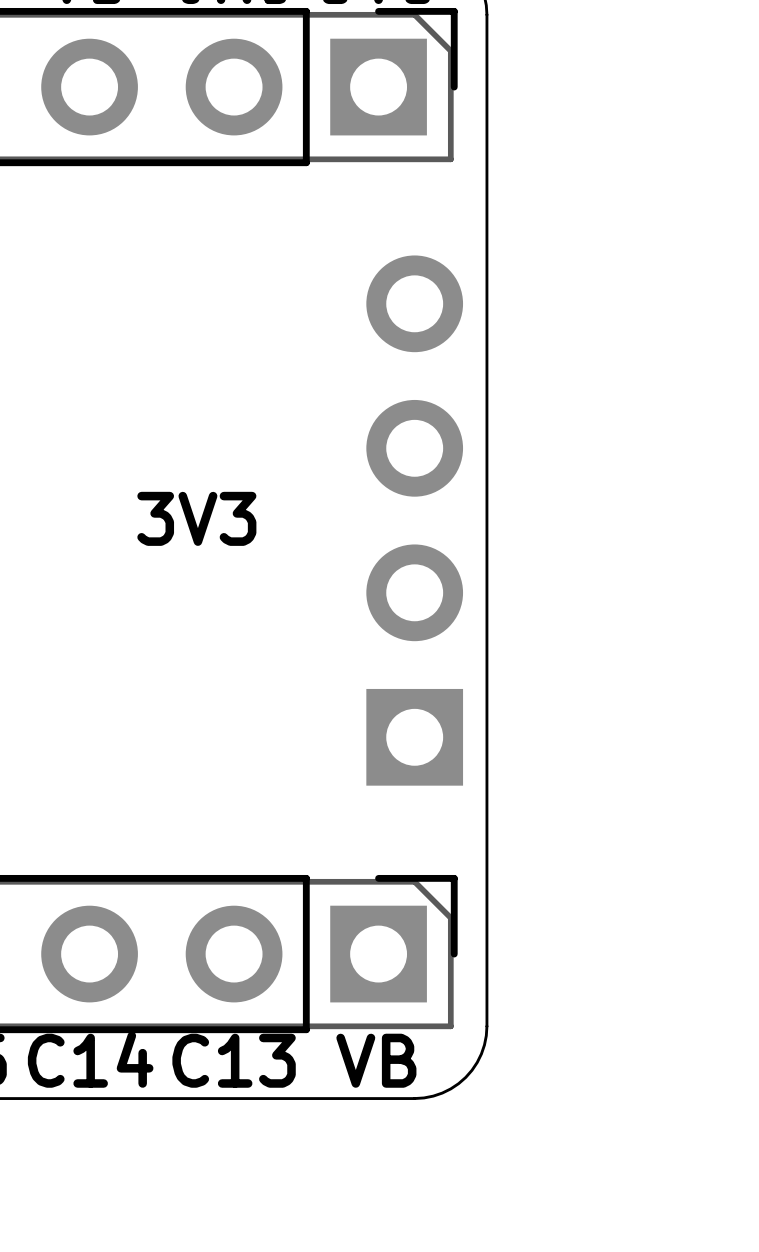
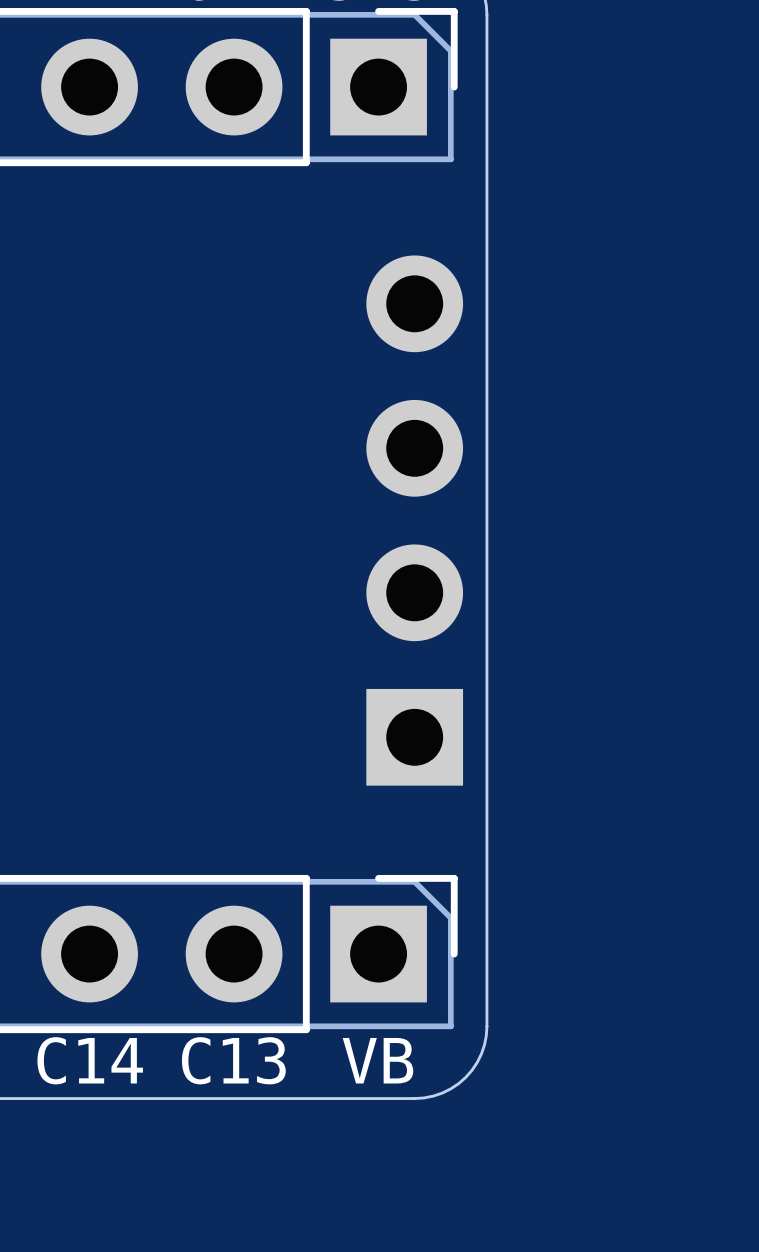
text: 3V3 (196, 518) -> none

